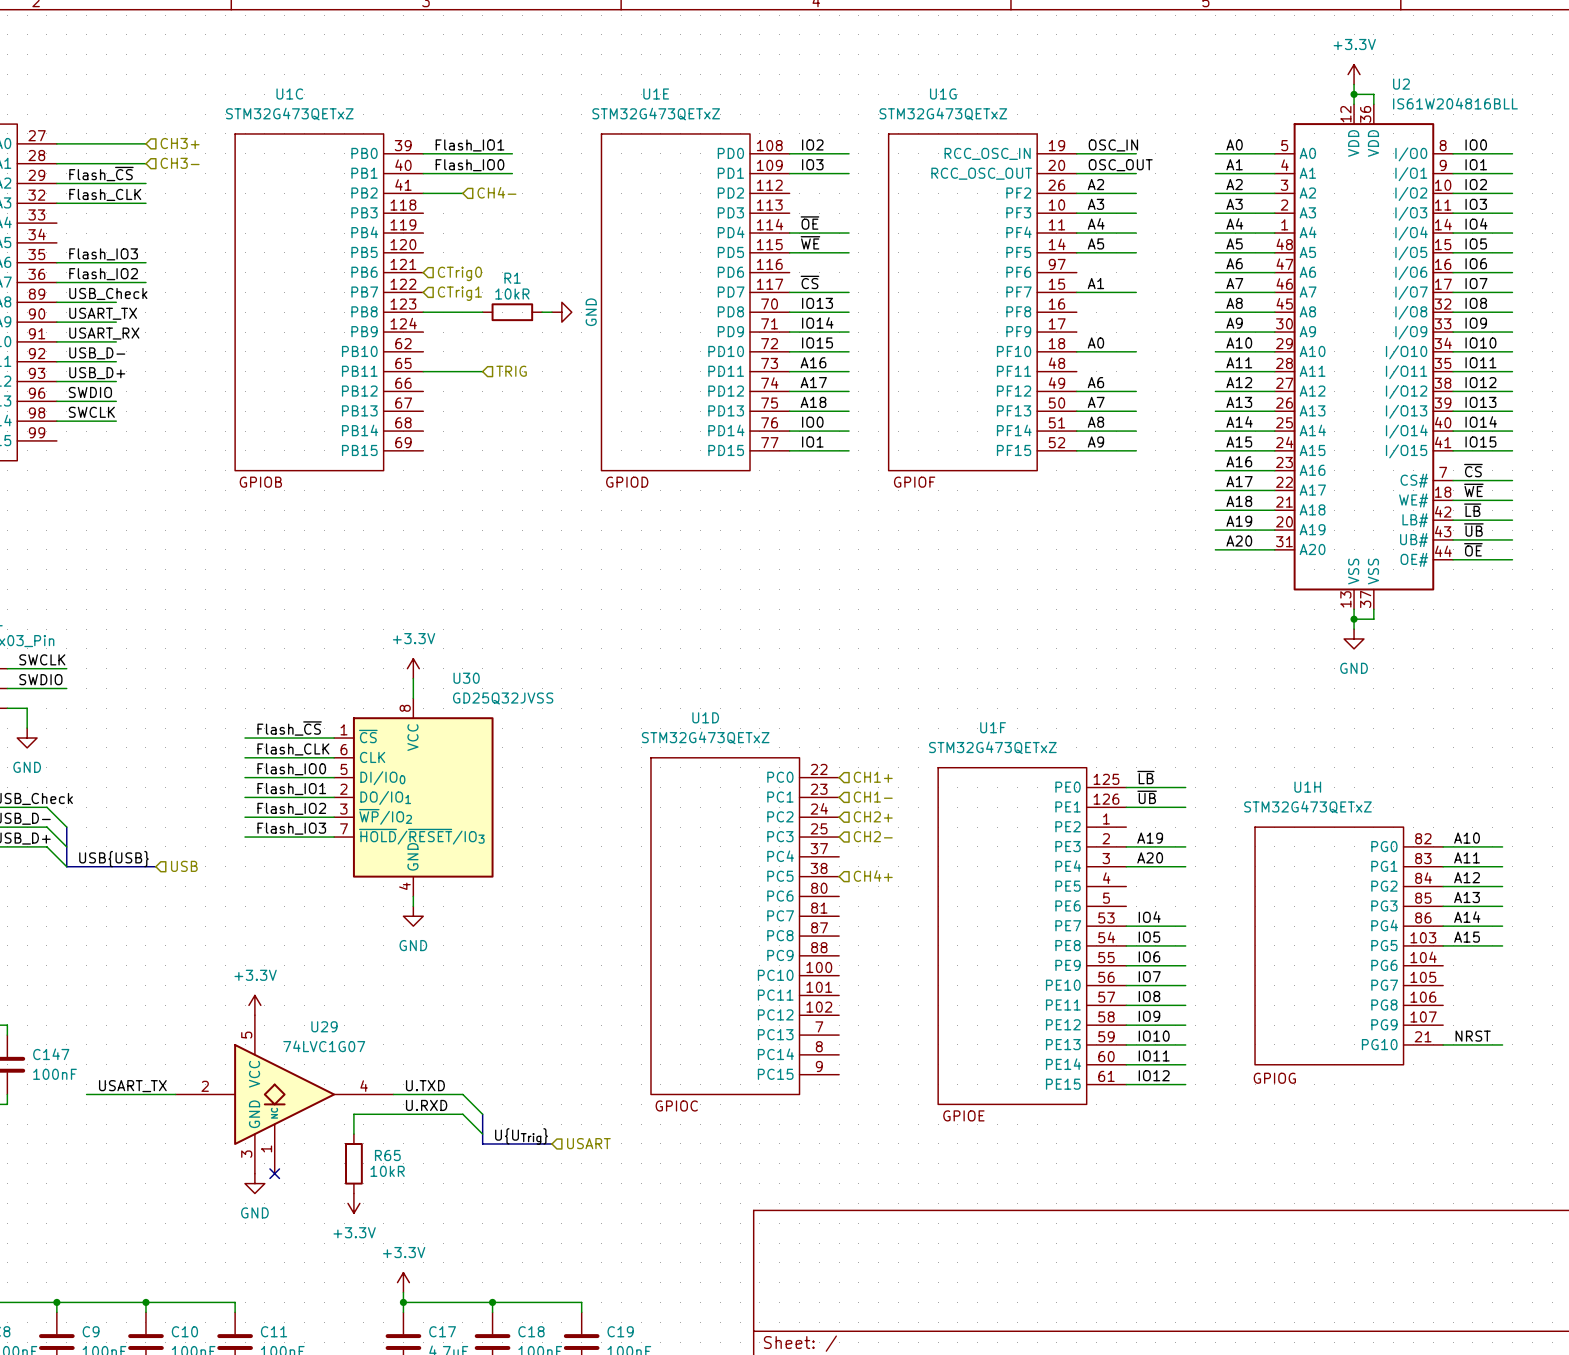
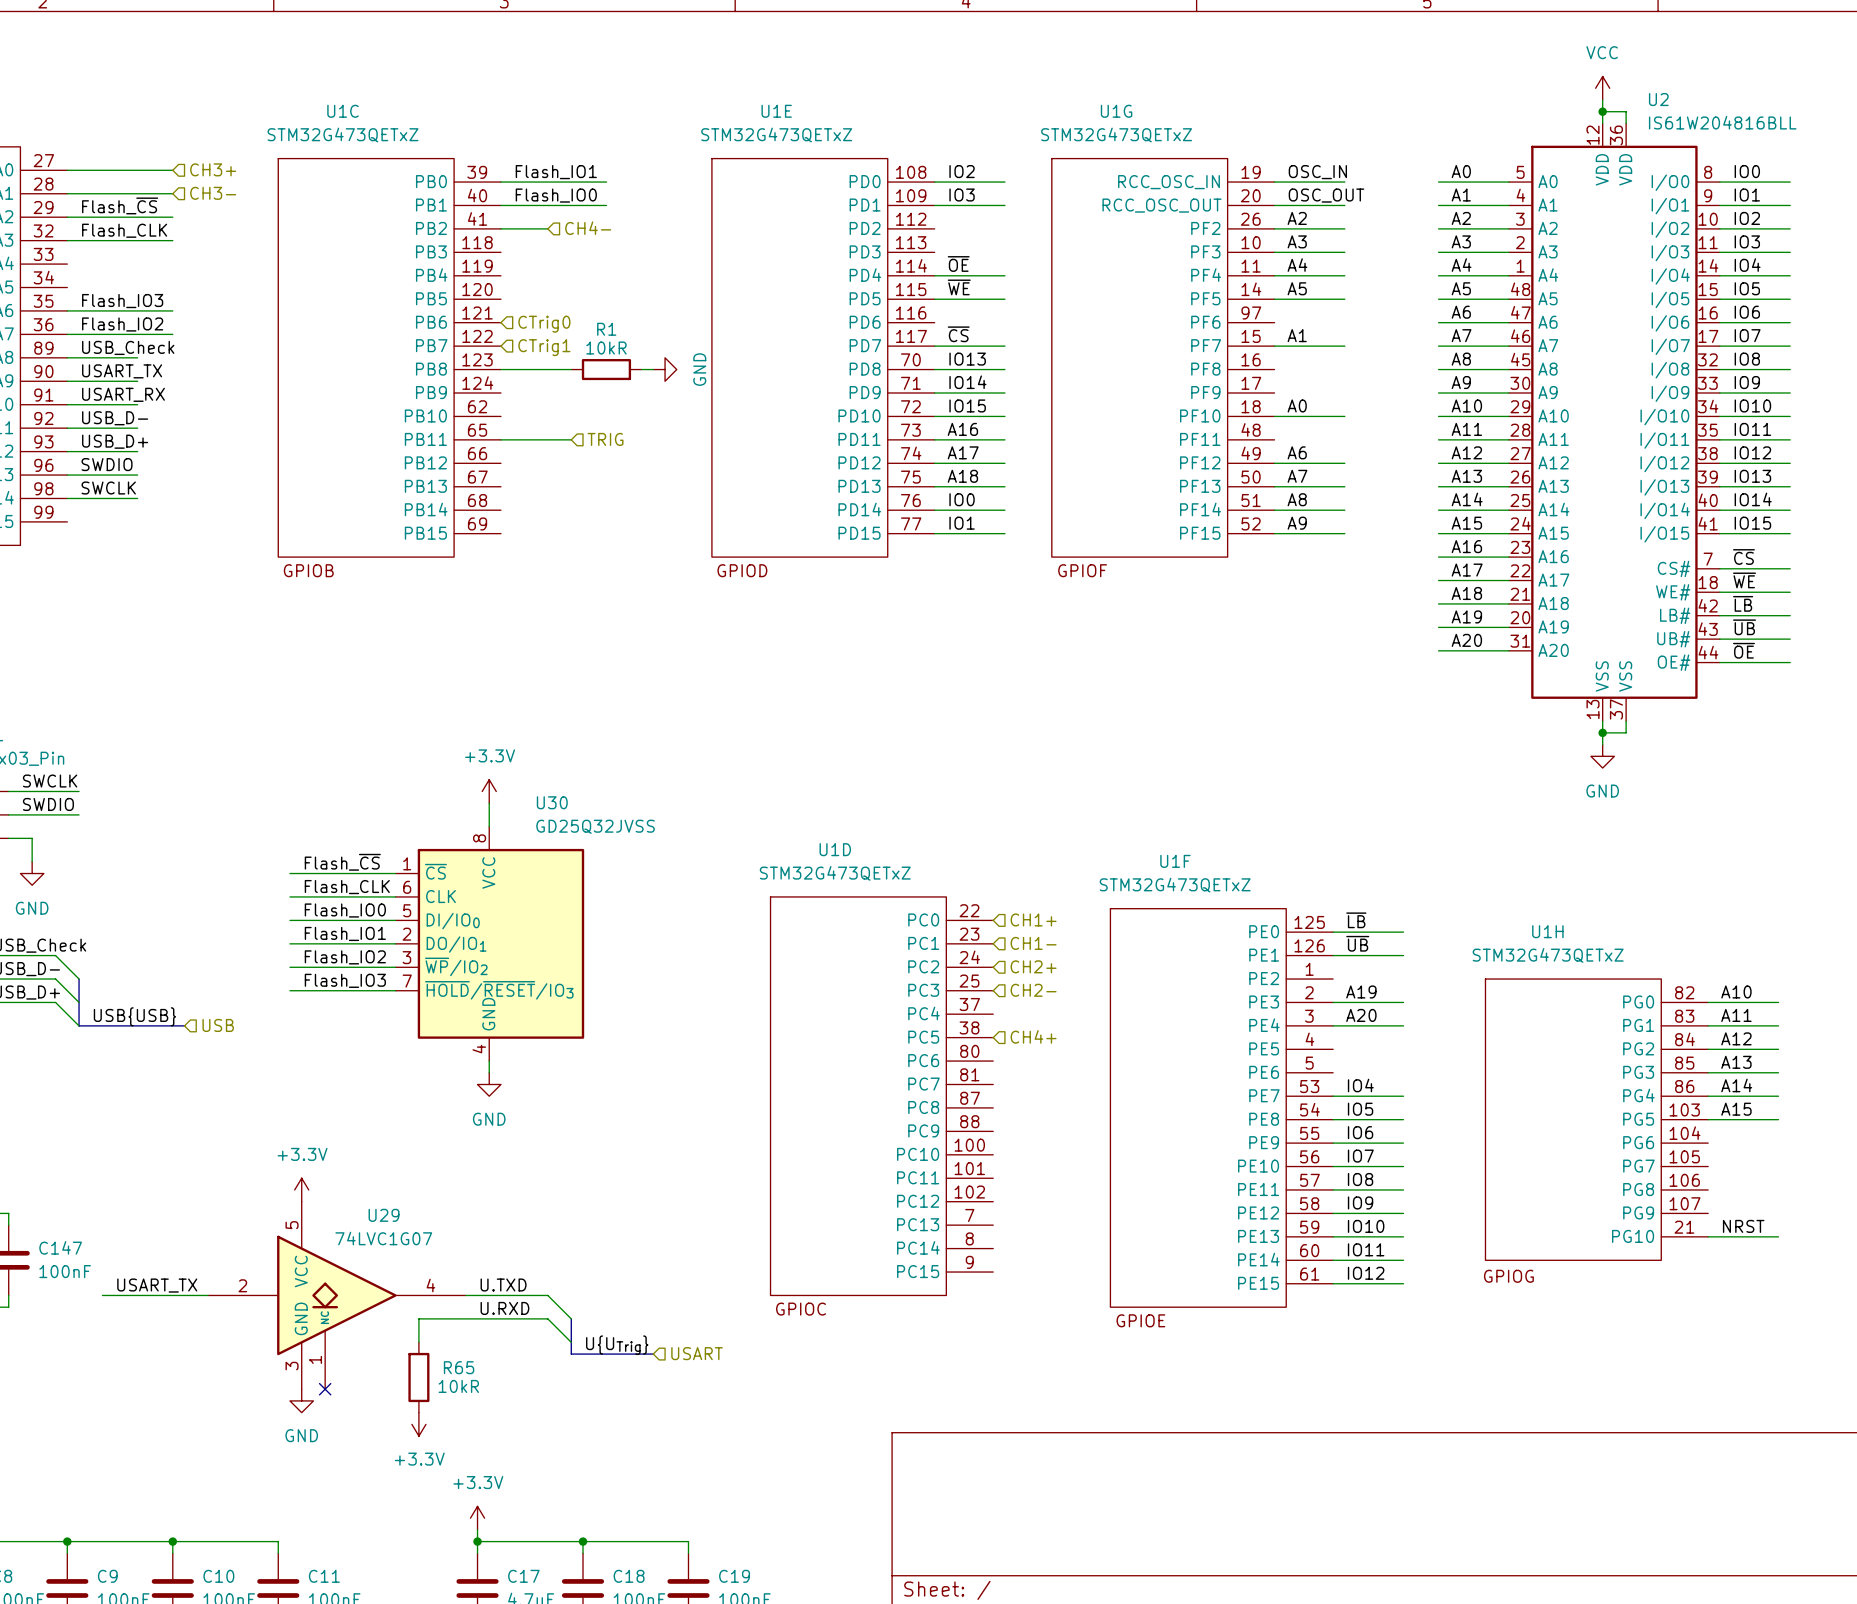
power symbol: +3.3V (1354, 74) -> VCC (1602, 88)

